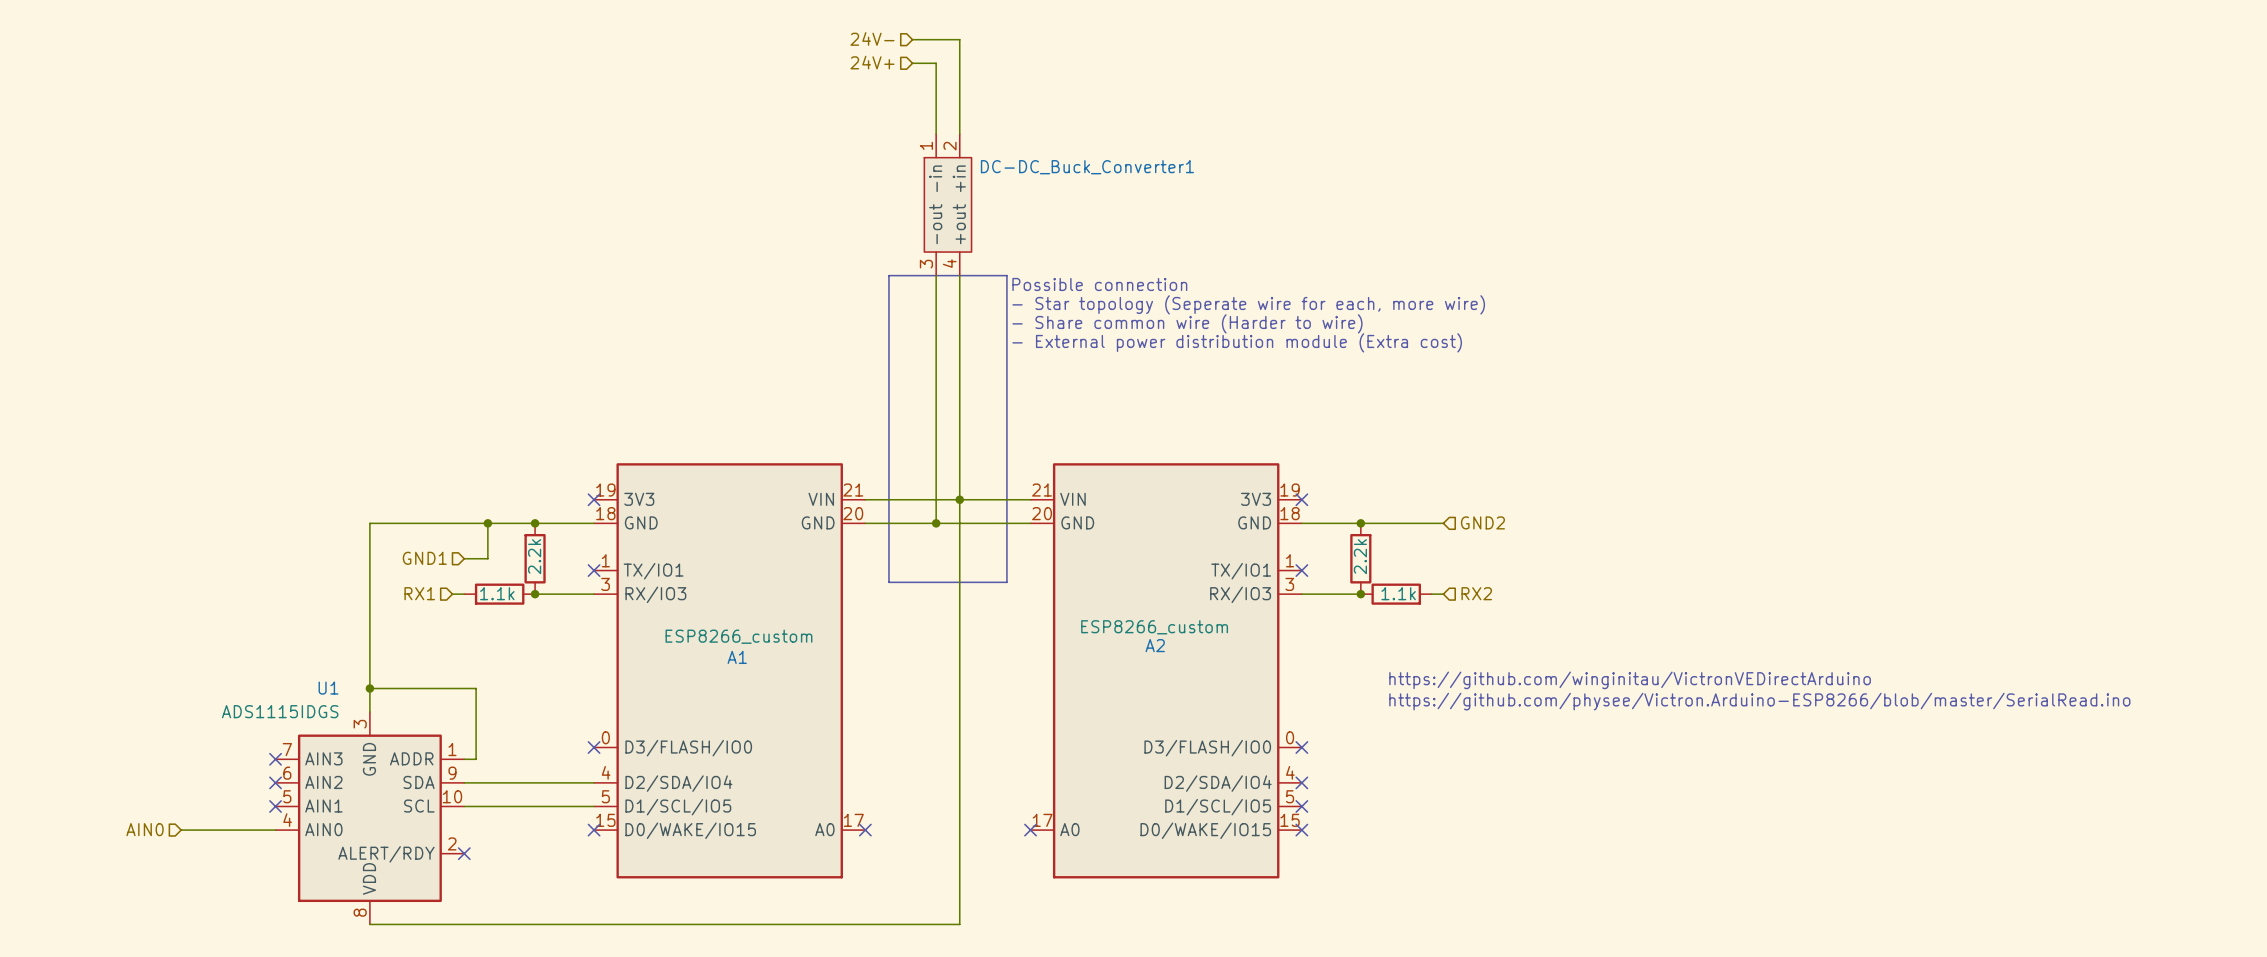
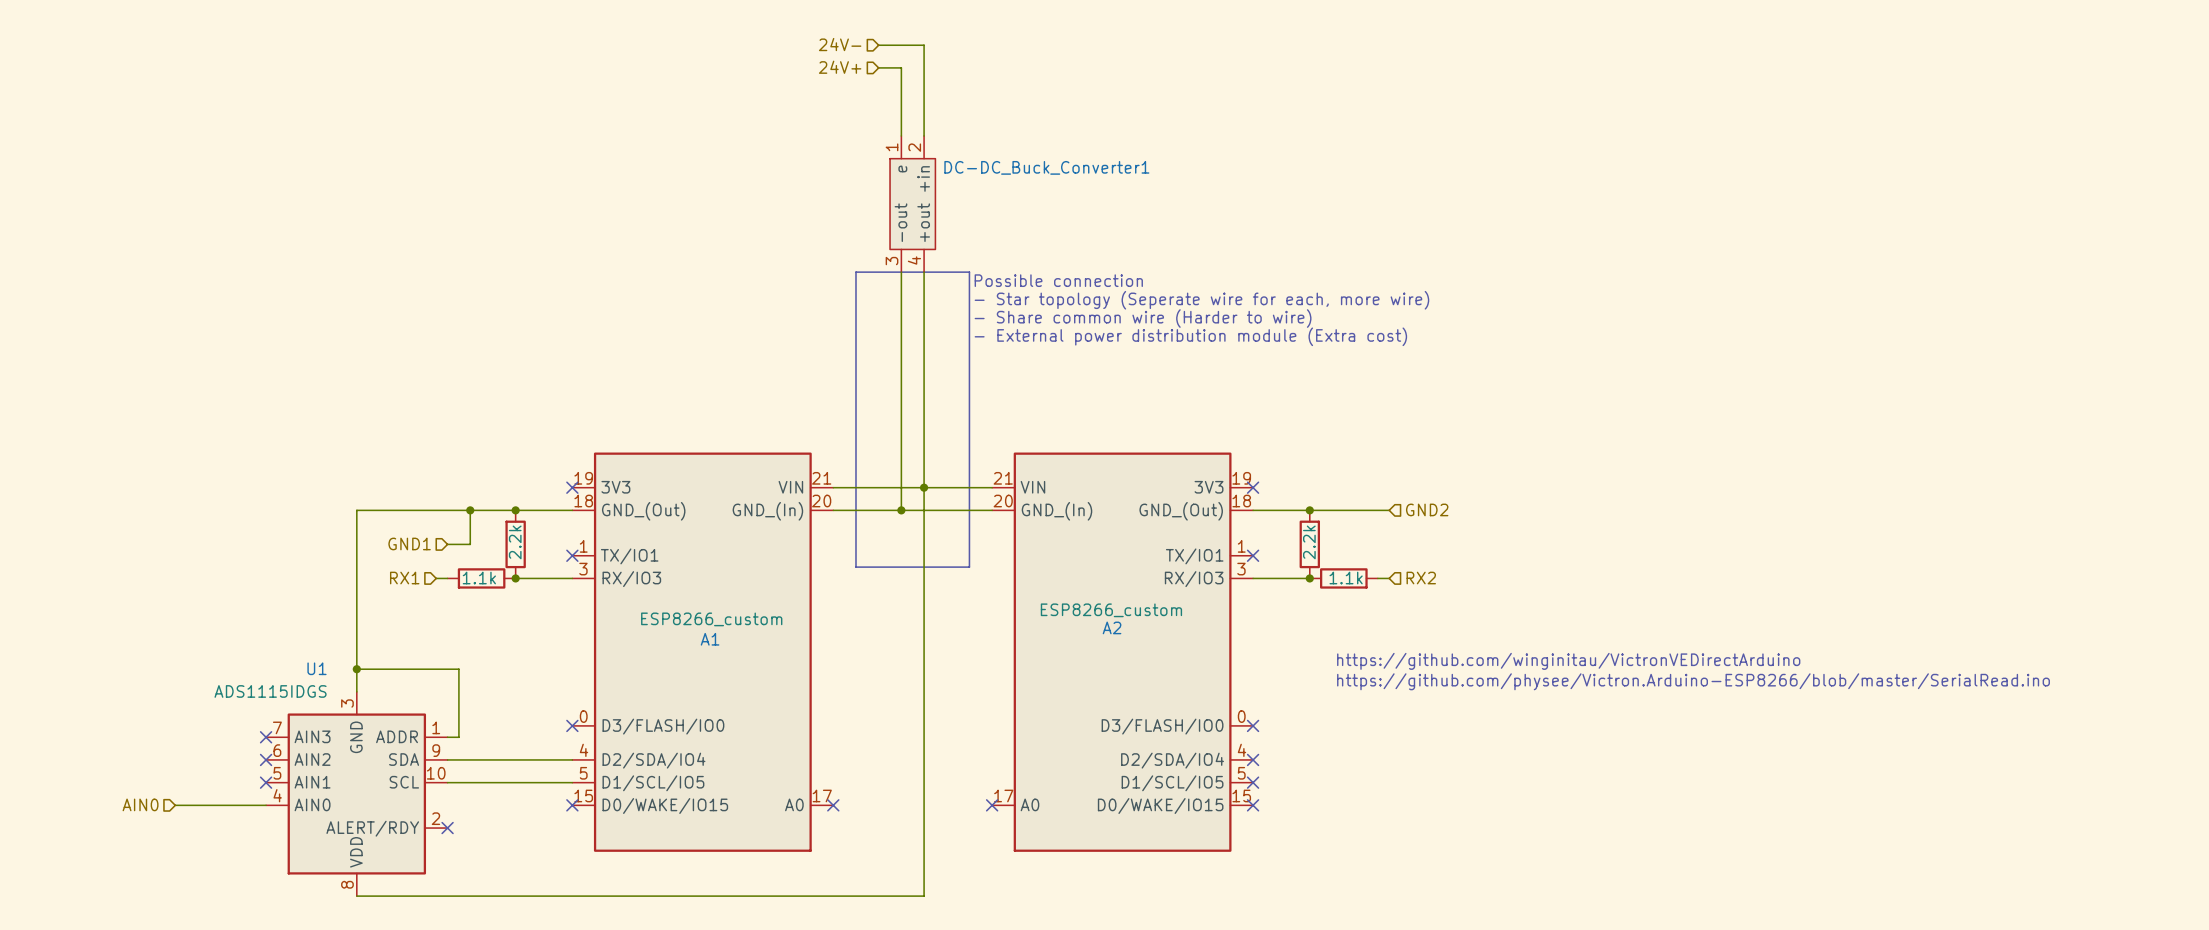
DC-DC_Buck_Converter1 pin name: -in (935, 178) -> e (902, 168)
A1 pin name: GND (641, 522) -> GND_(Out) (643, 511)
A1 pin name: GND (818, 522) -> GND_(In) (767, 511)
A2 pin name: GND (1077, 522) -> GND_(In) (1056, 511)
A2 pin name: GND (1254, 522) -> GND_(Out) (1181, 511)

